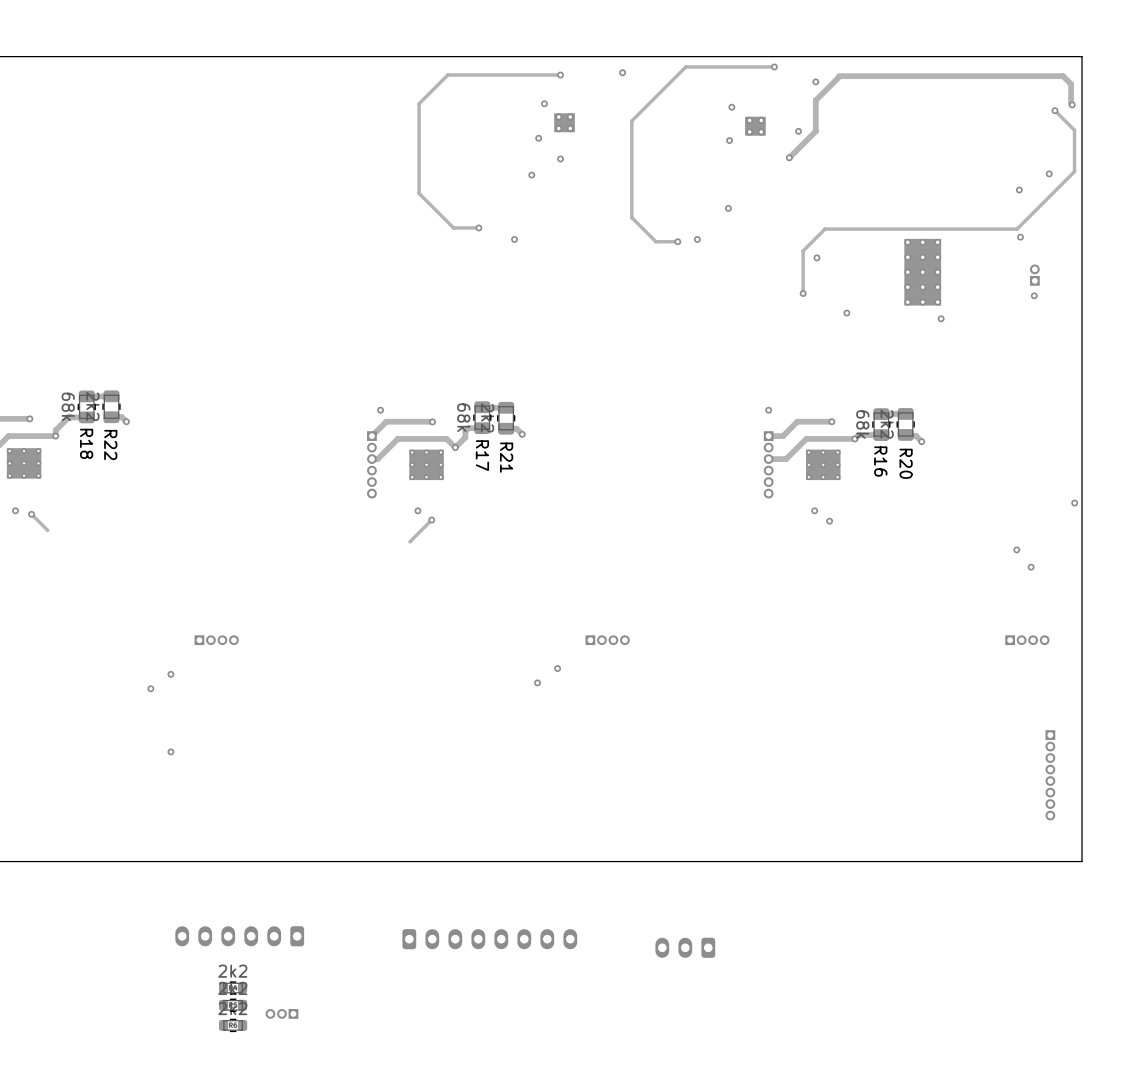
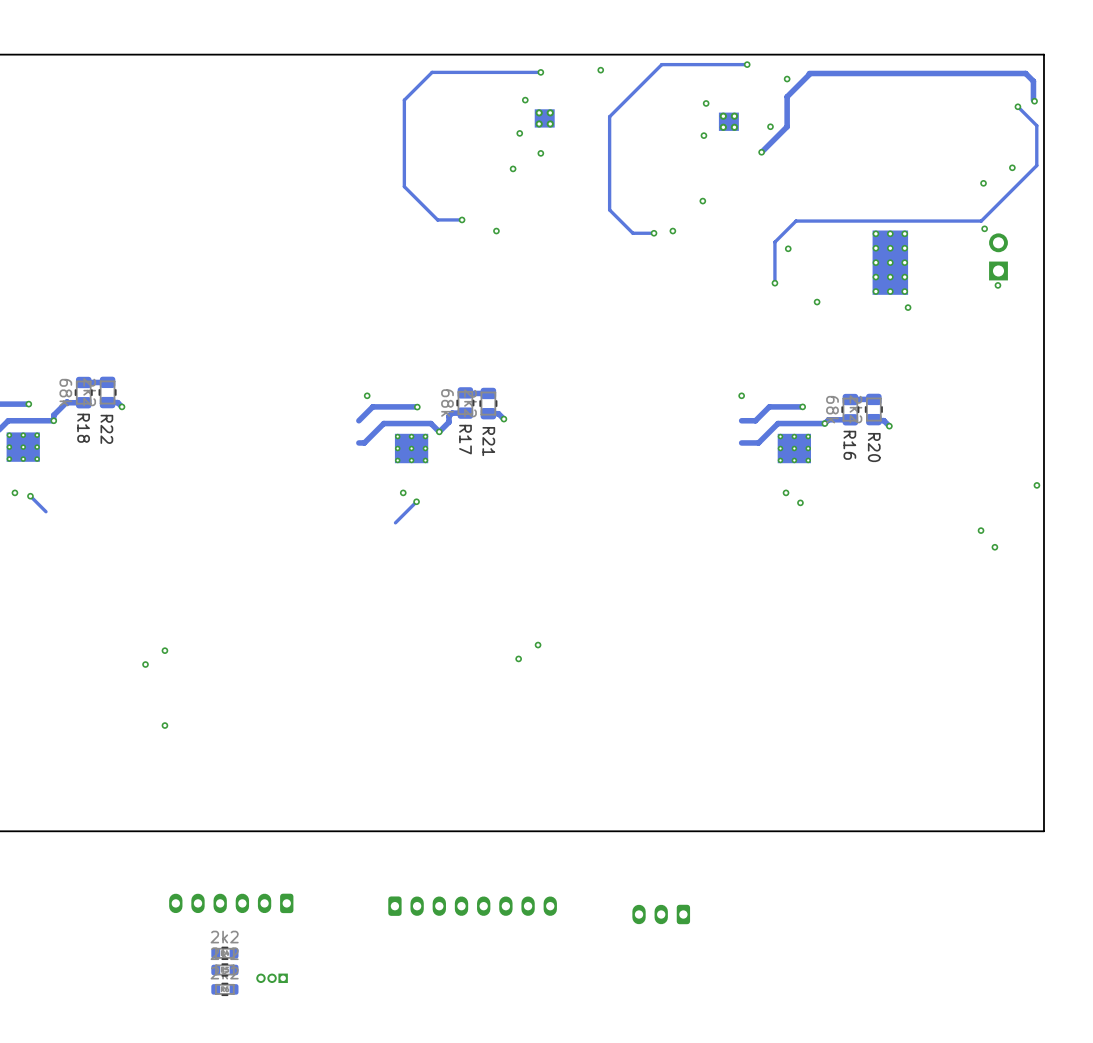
part footprint: [1029, 264, 1040, 286] -> [989, 233, 1008, 281]
part: (371, 464) -> none
part: (768, 464) -> none
part: (216, 640) -> none
part: (607, 640) -> none
part: (1027, 640) -> none
part: (1050, 775) -> none

